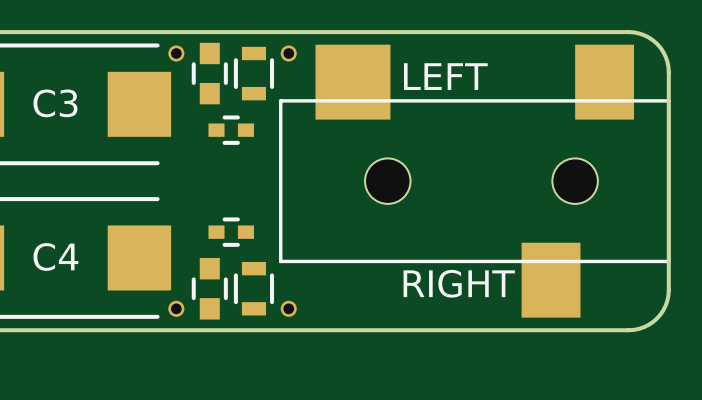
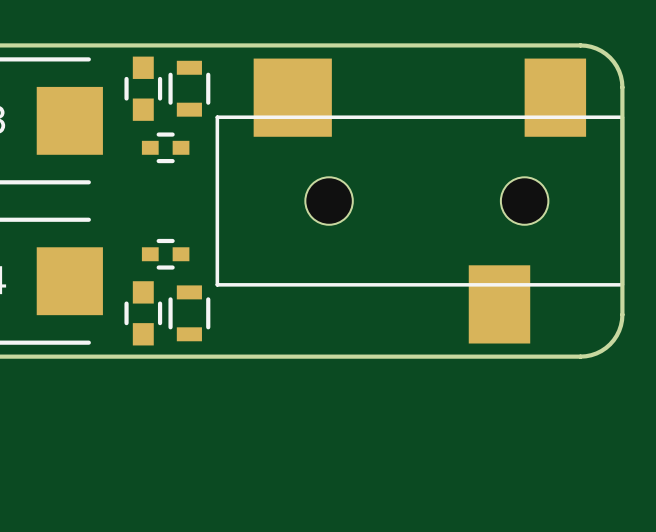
part: (176, 53) -> none
part: (288, 53) -> none
text: LEFT (445, 76) -> none
text: RIGHT (459, 283) -> none
part: (176, 308) -> none
part: (288, 308) -> none

